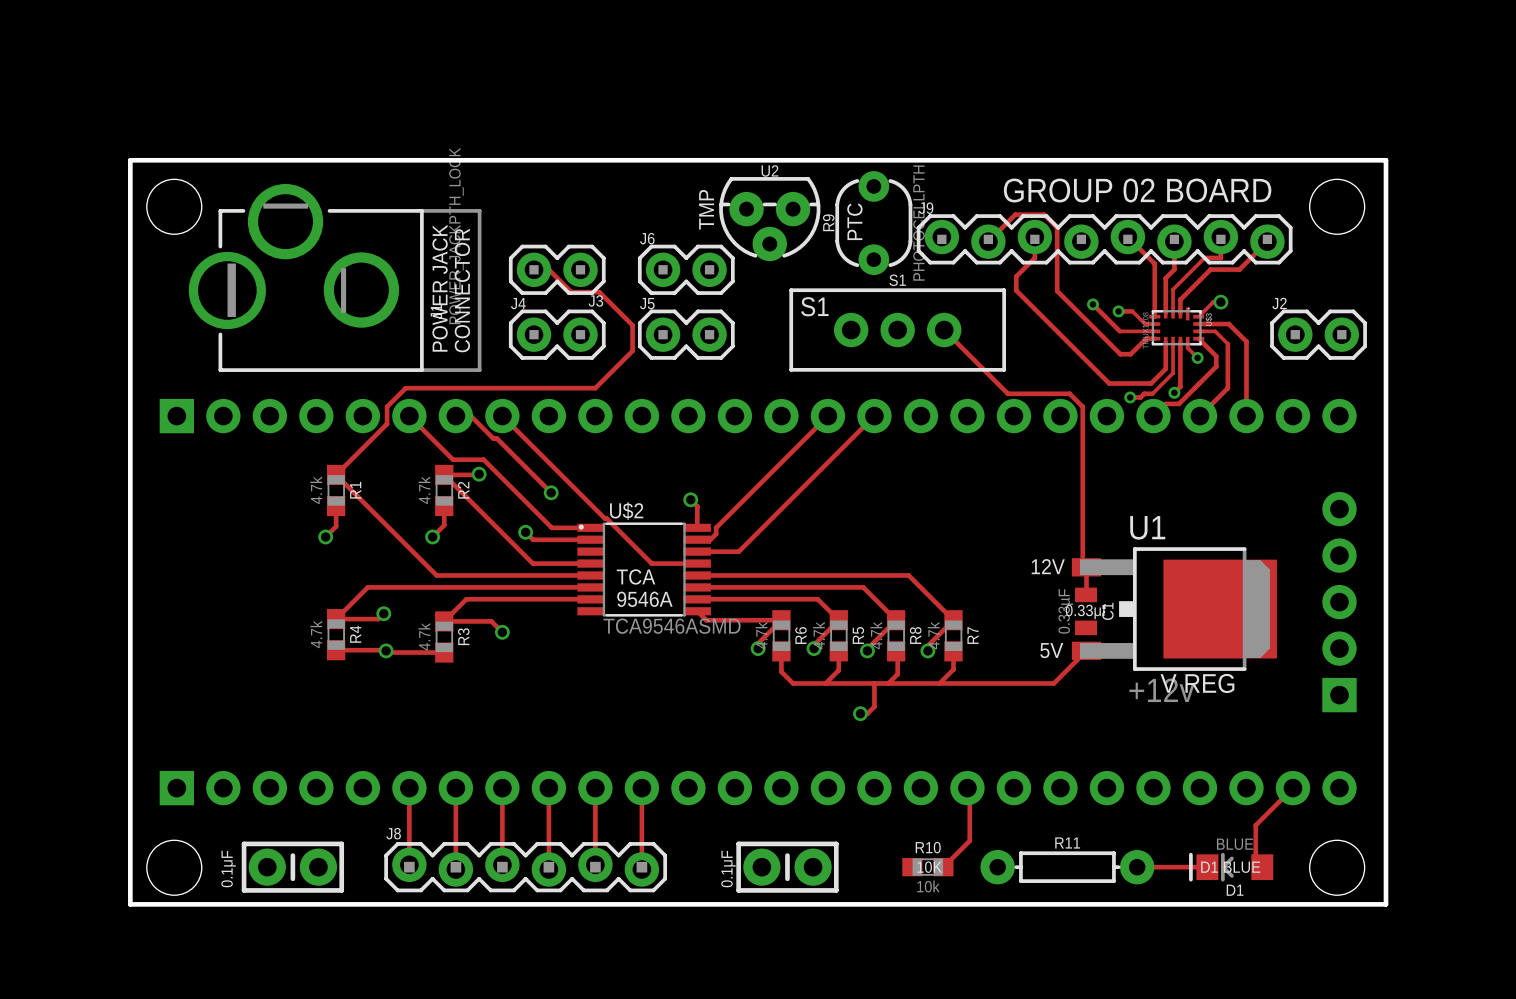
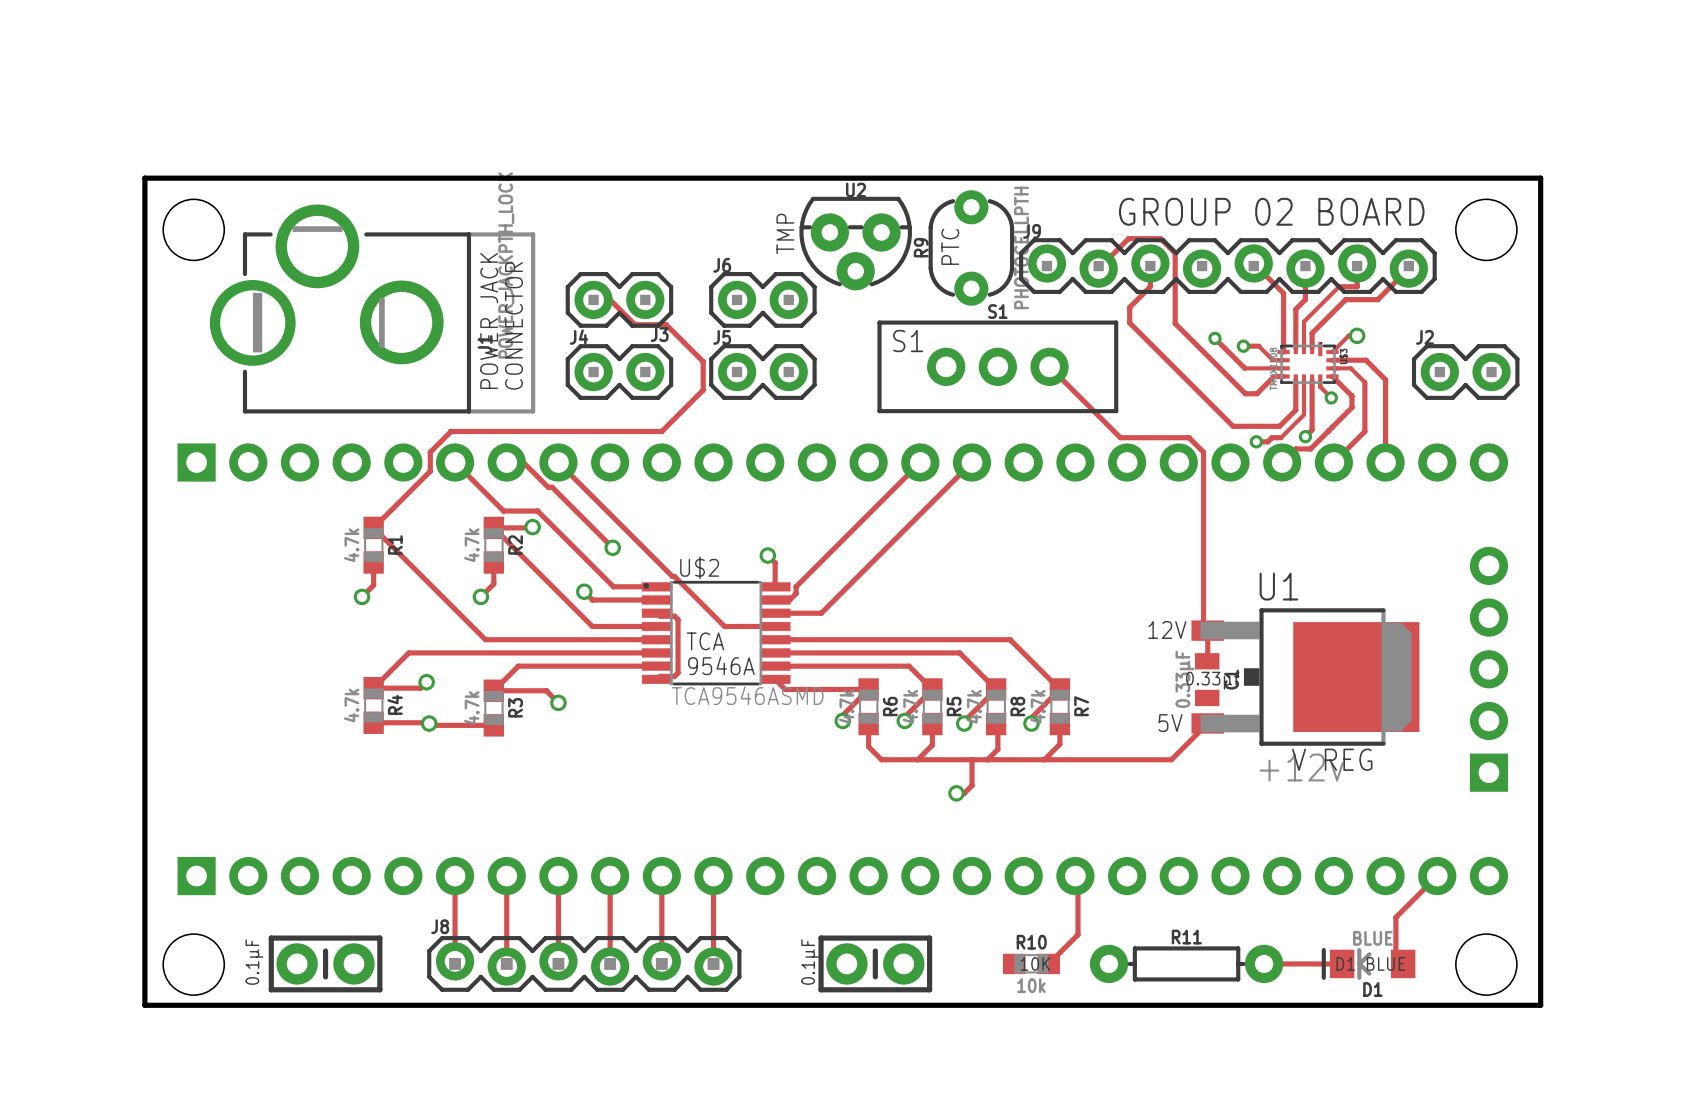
track: none -> (657, 613) (660, 616) (674, 616) (678, 619) (678, 672) (674, 676) (660, 676) (657, 679)

